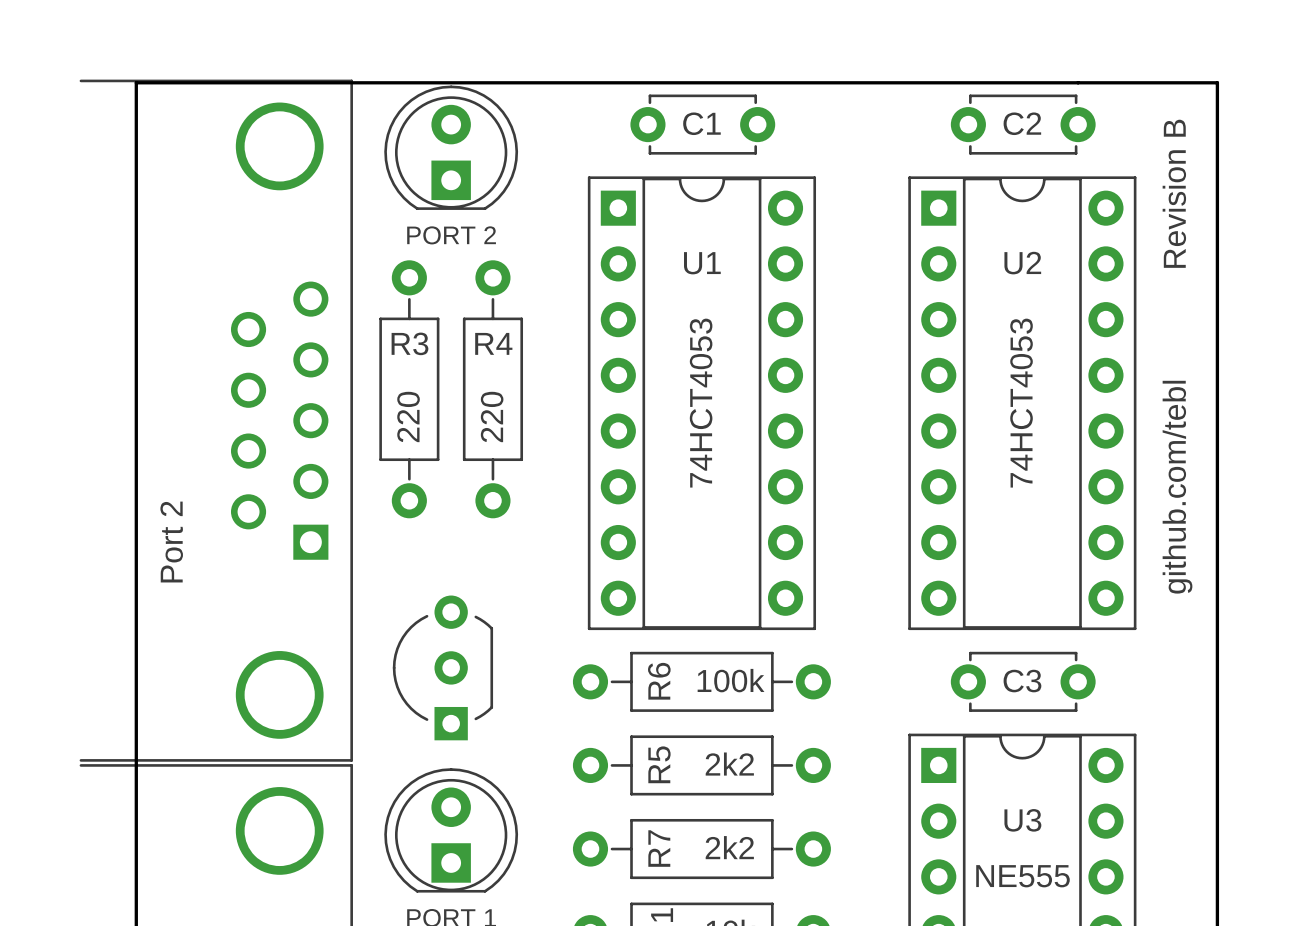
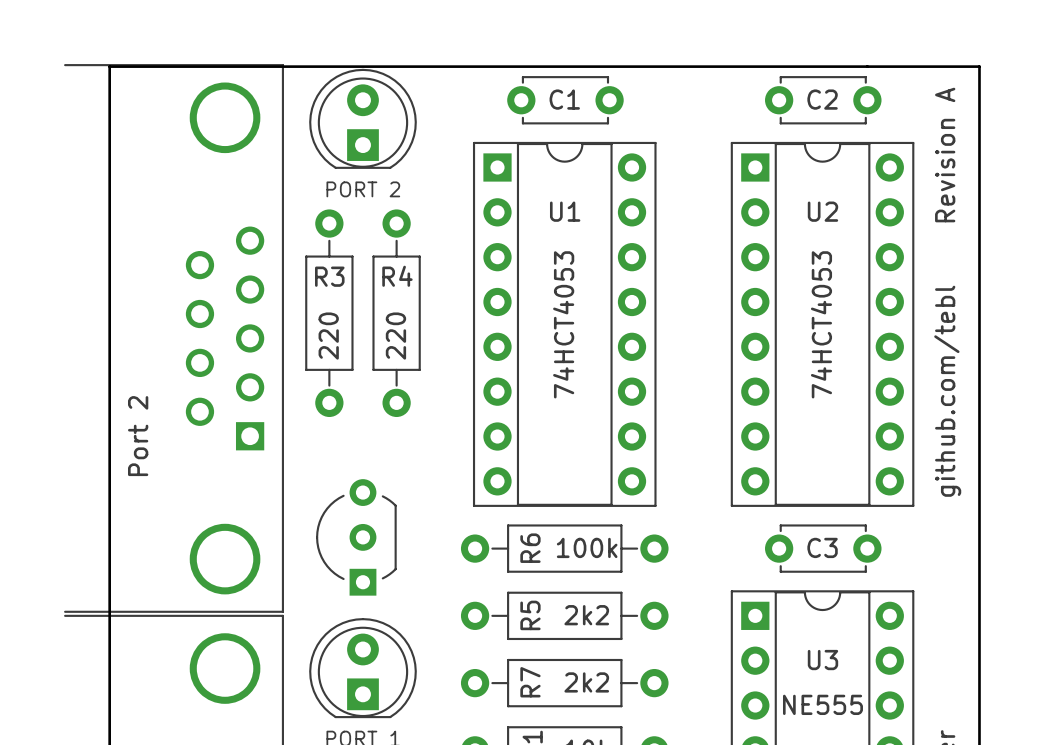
text: Revision B (1174, 193) -> Revision A (945, 155)

